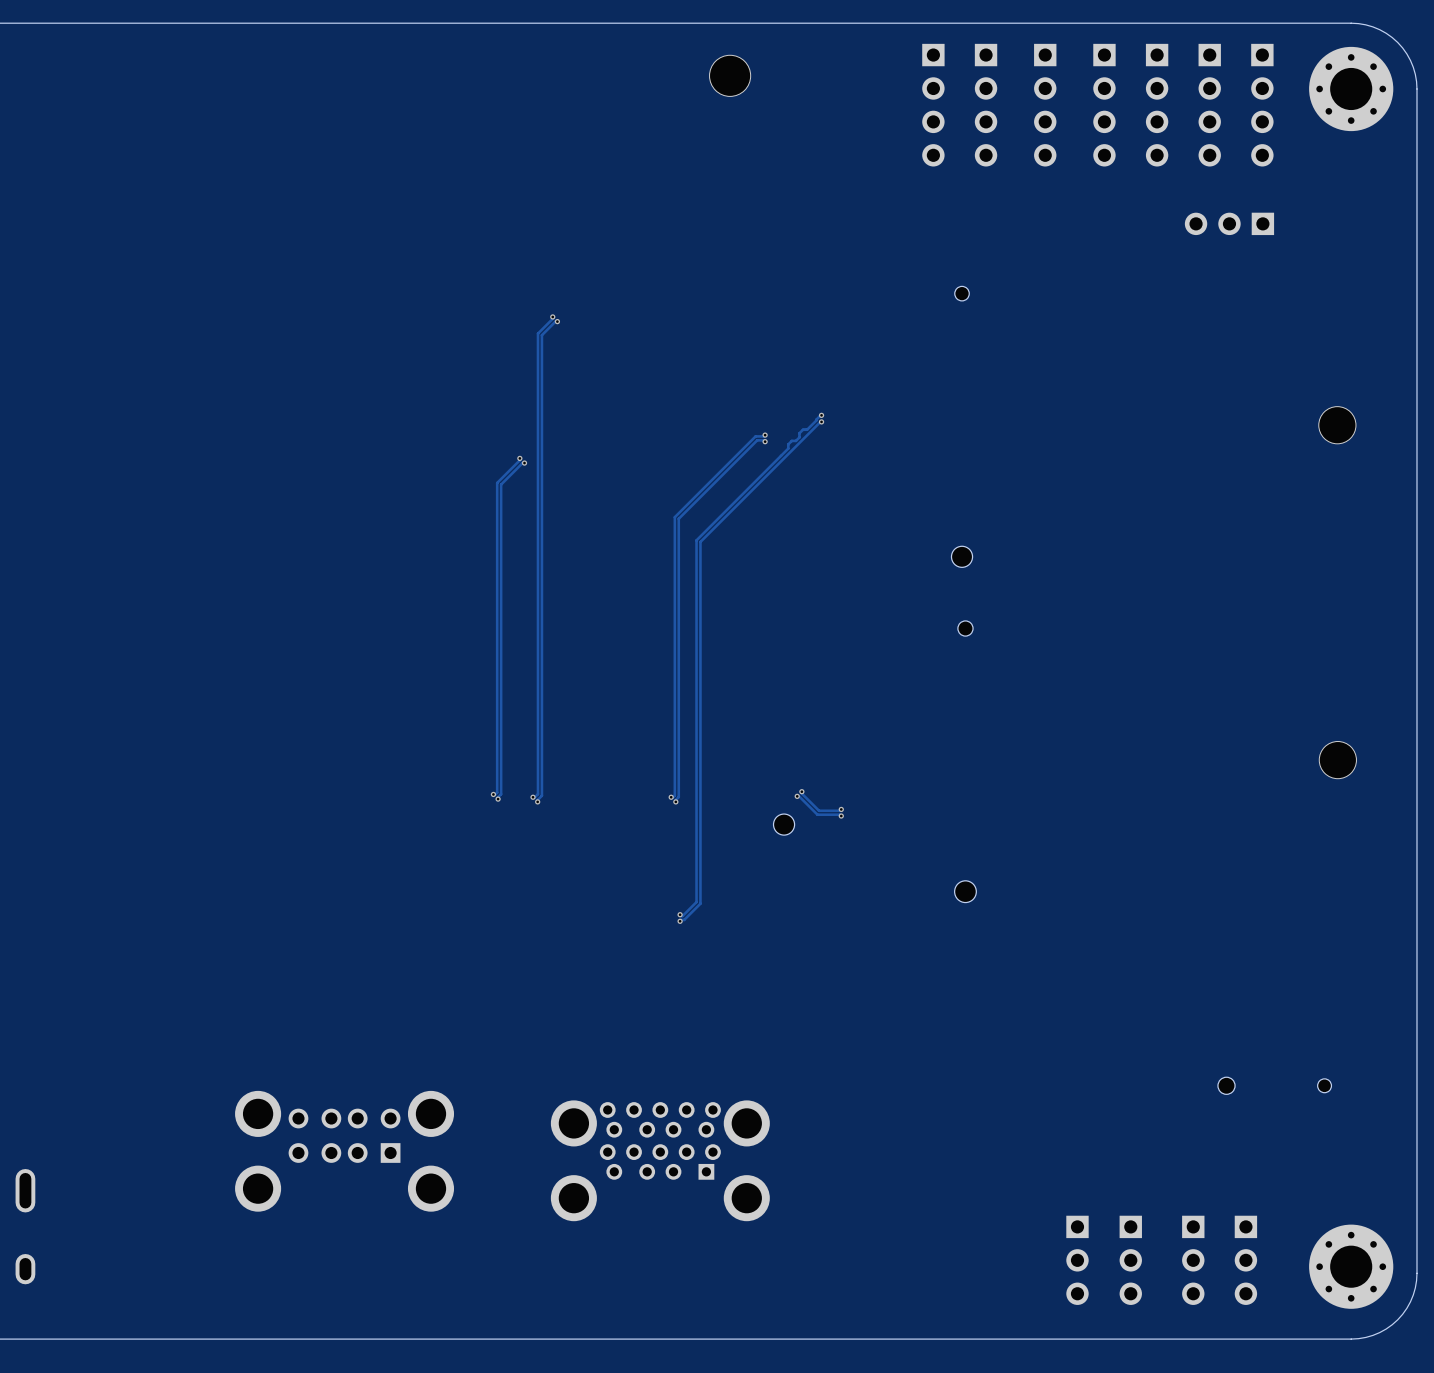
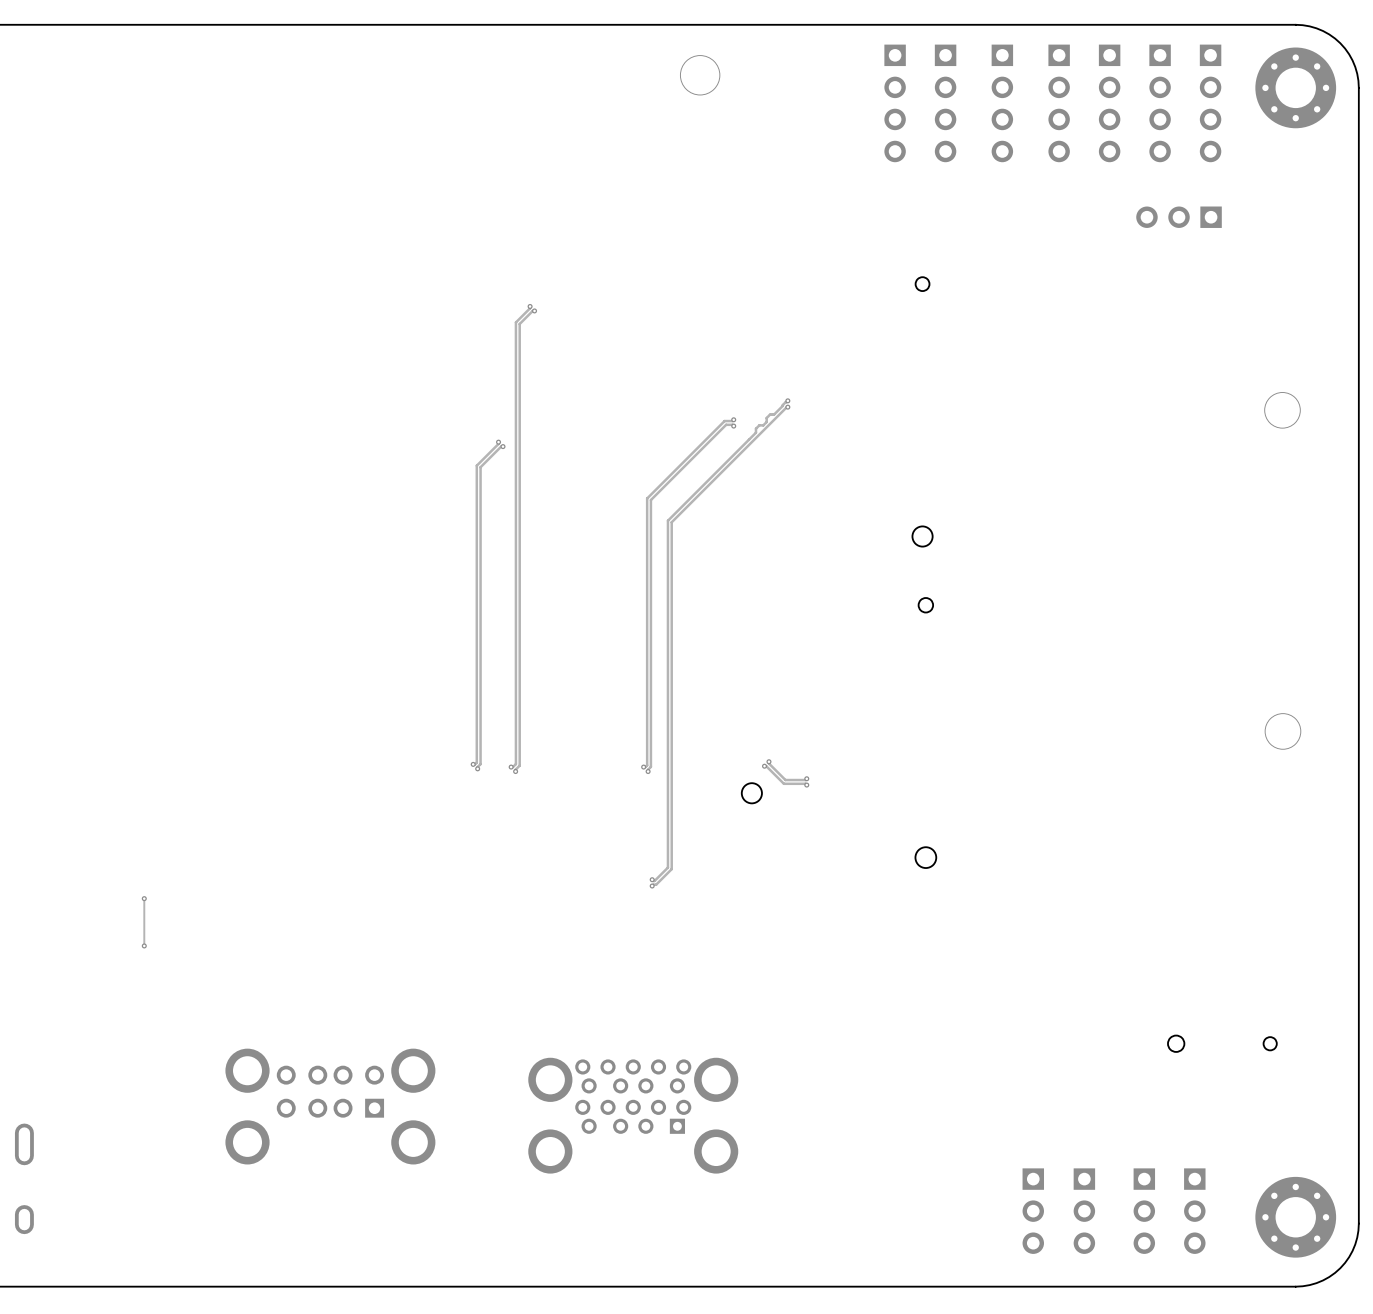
track: none -> (144, 898) (144, 945)
via: none -> (144, 898)
via: none -> (144, 945)

